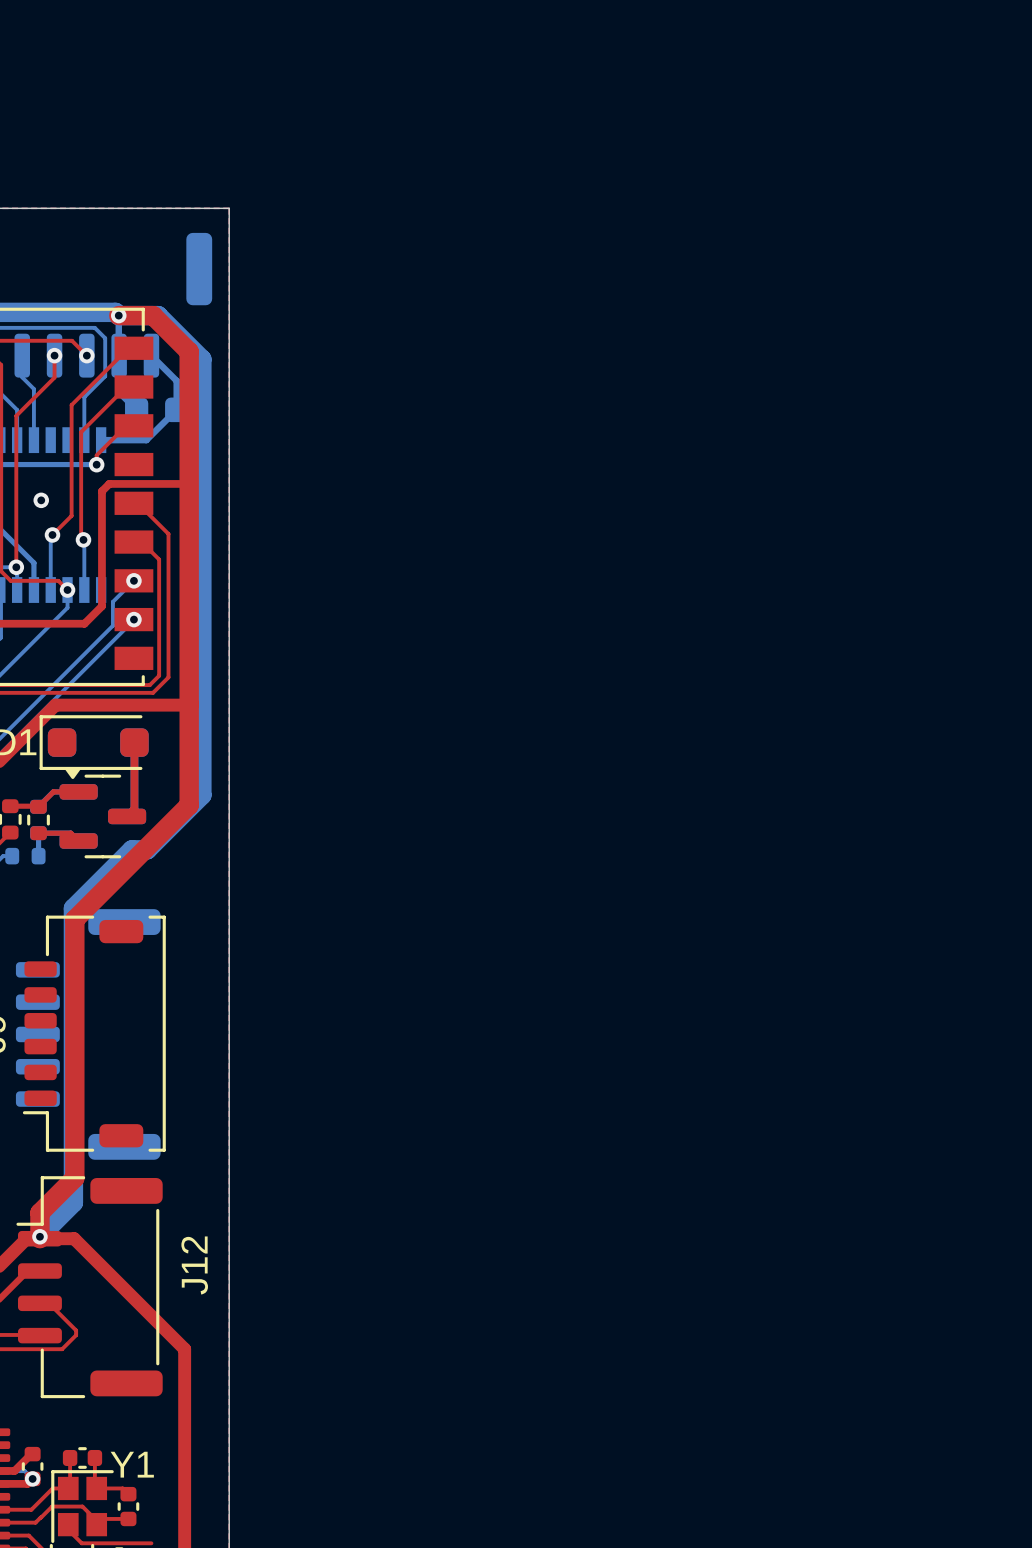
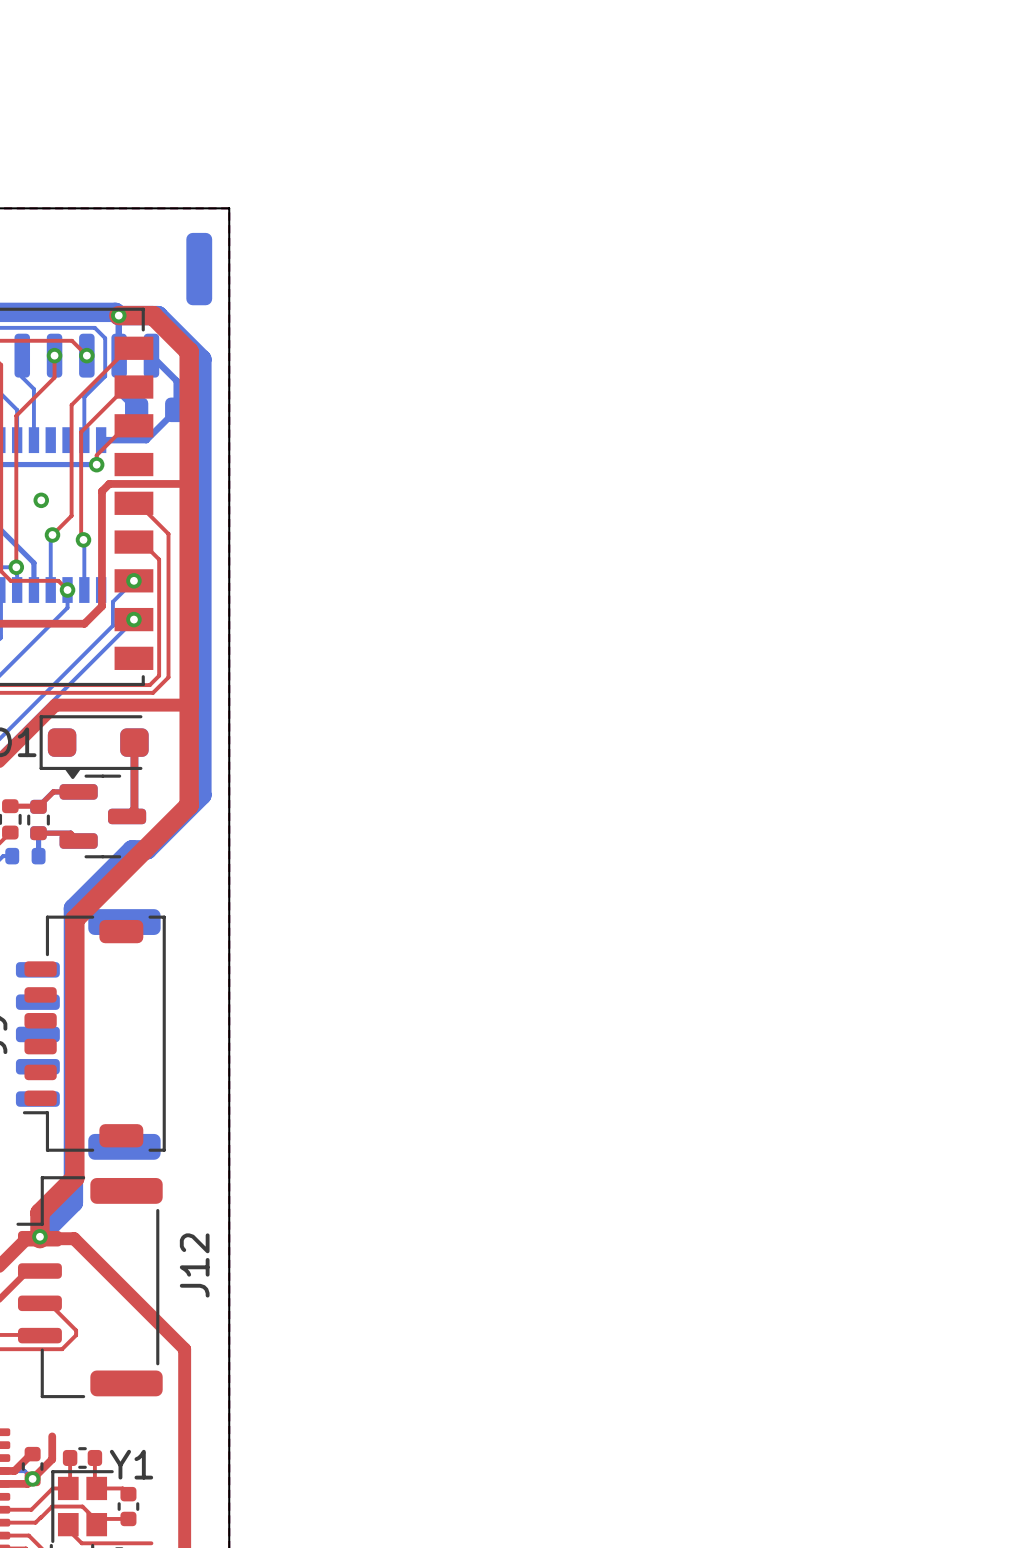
top track: none -> (52, 1436) (52, 1459) (32, 1478)

